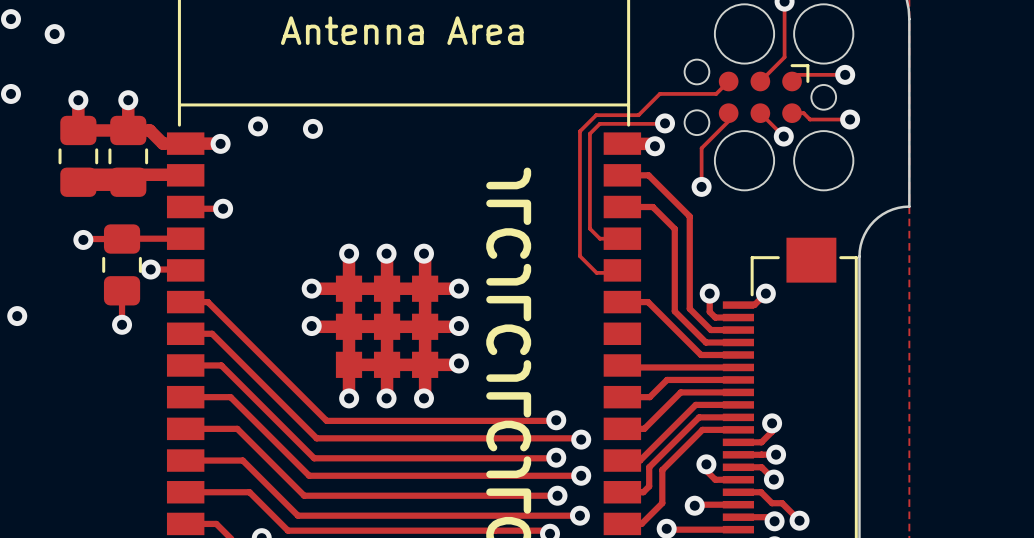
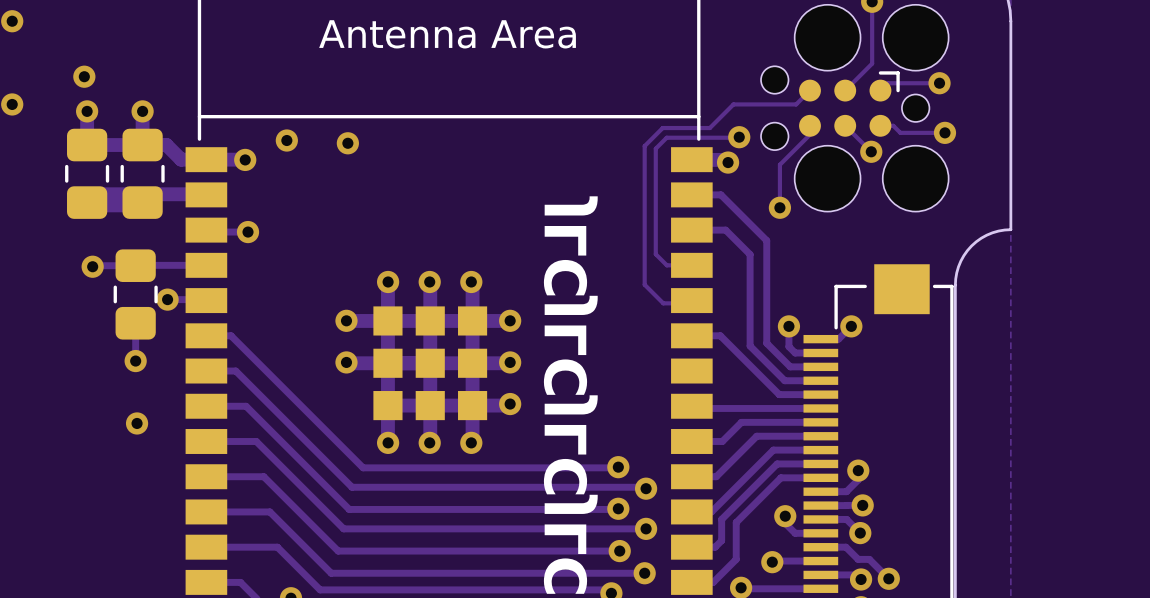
via position: (54, 34) -> (84, 76)
via position: (17, 316) -> (137, 423)

